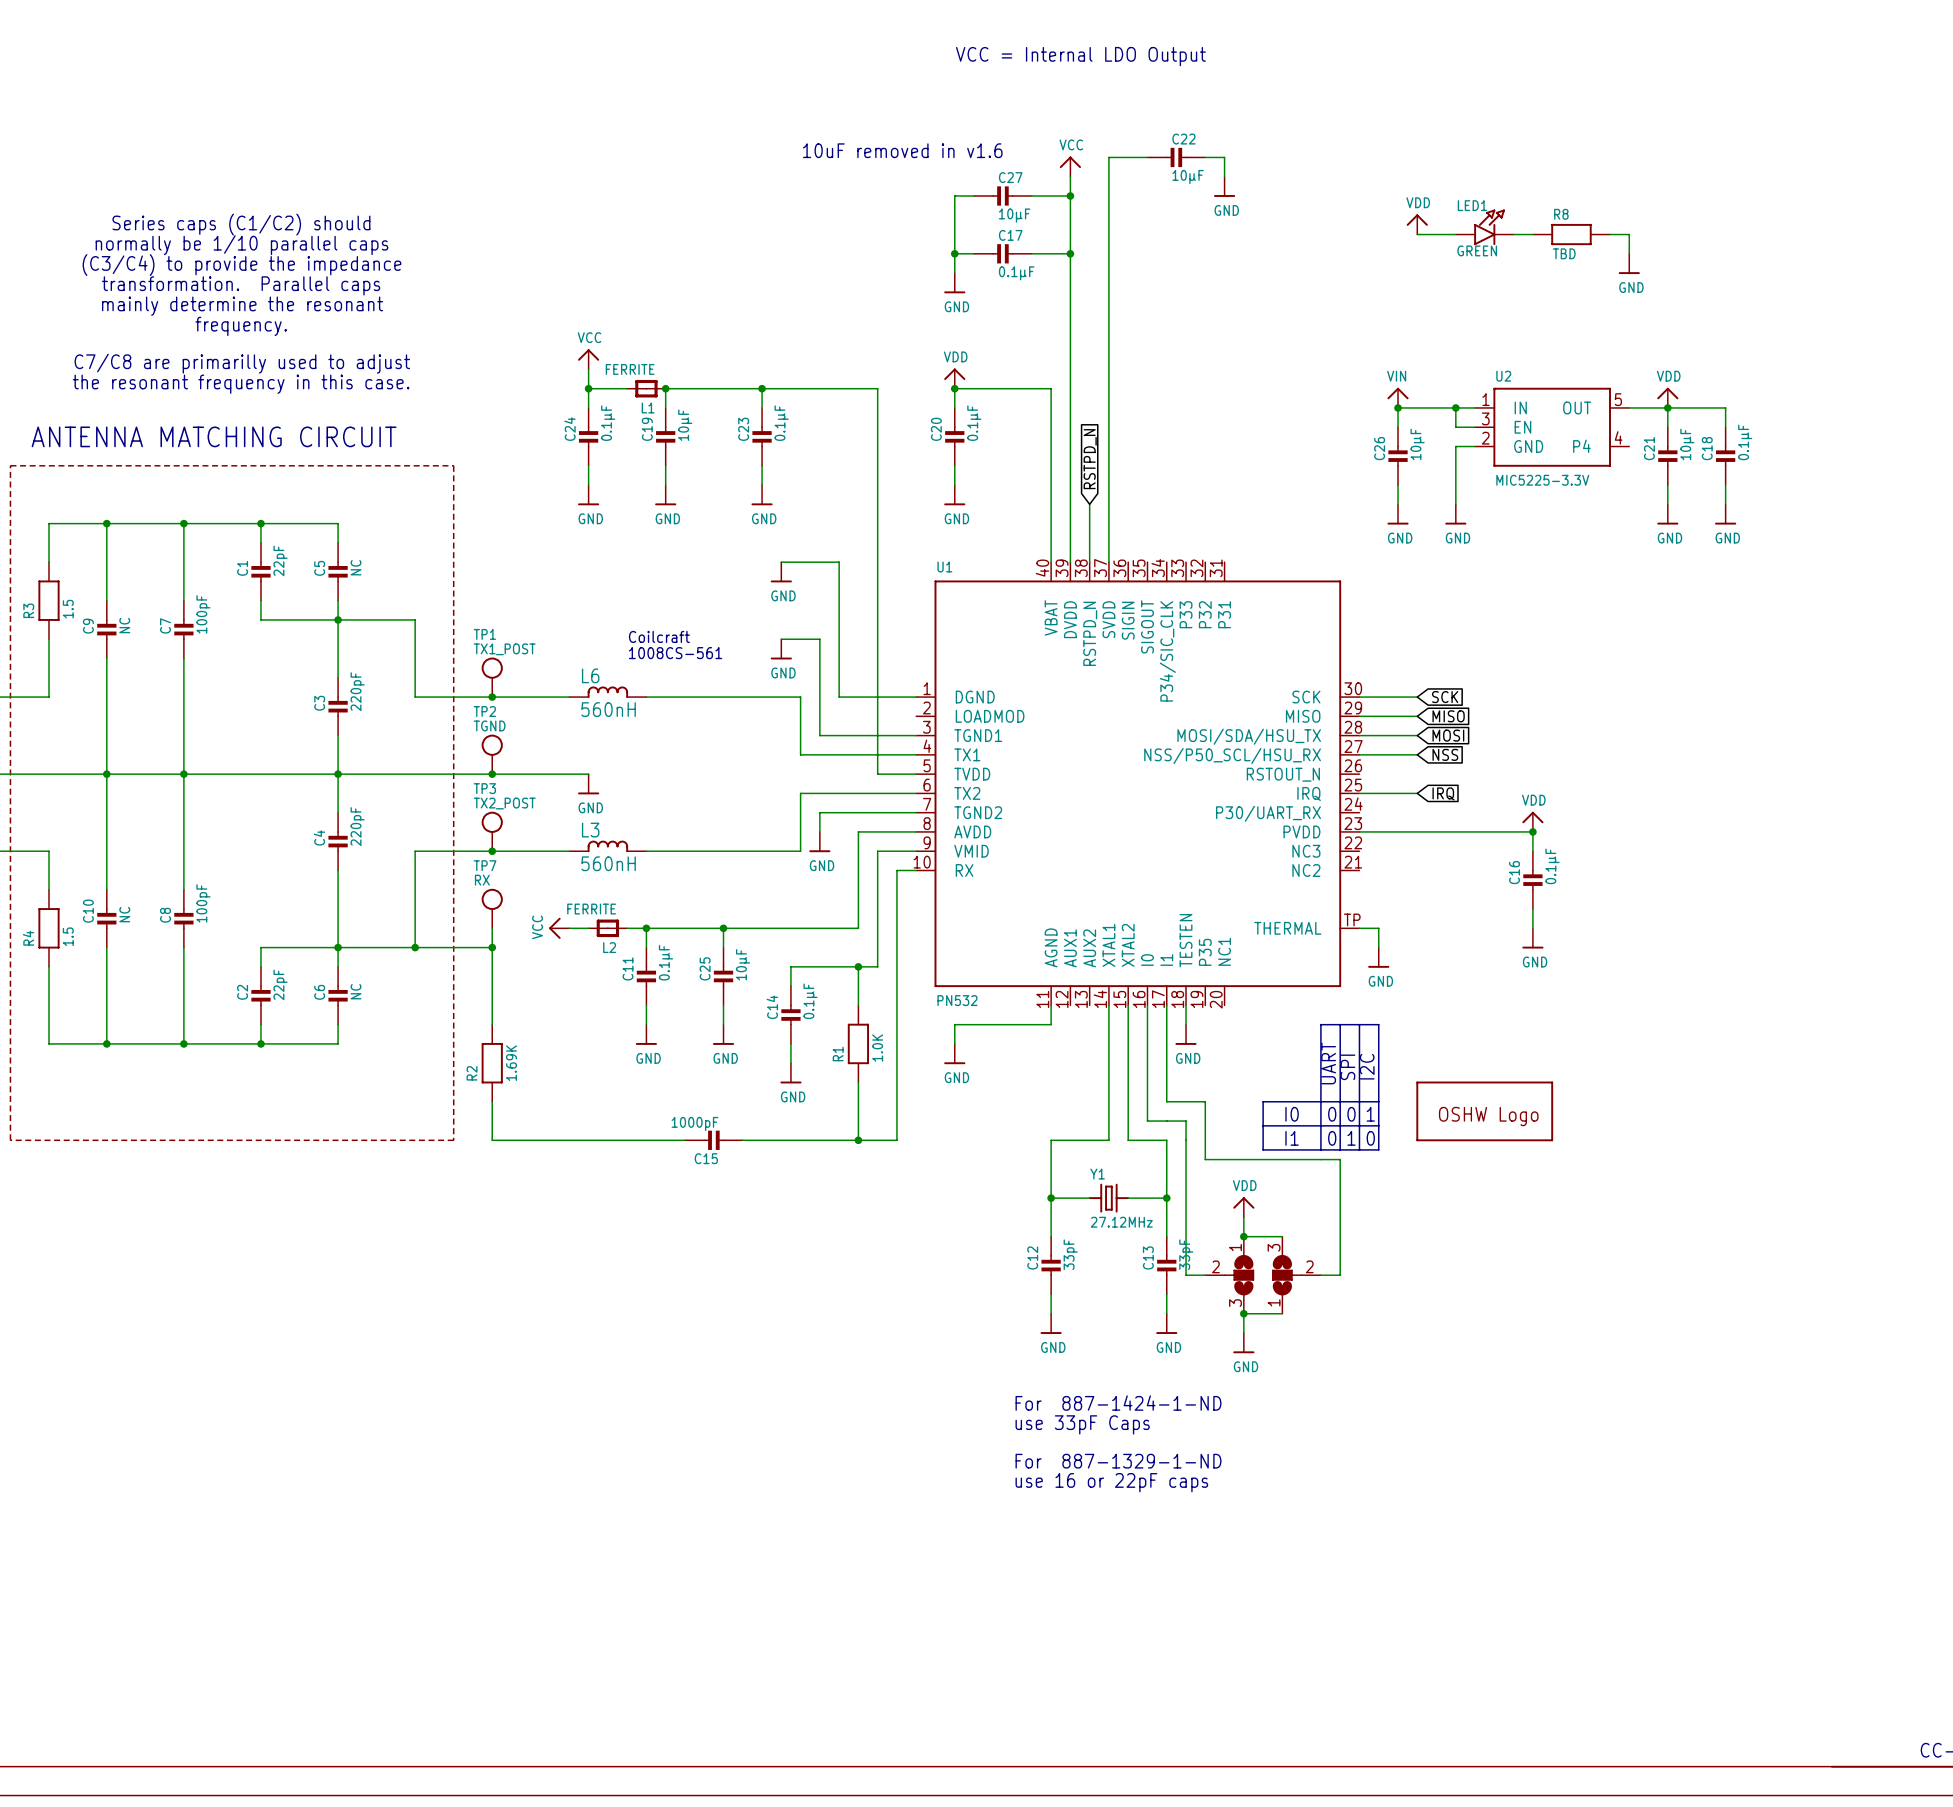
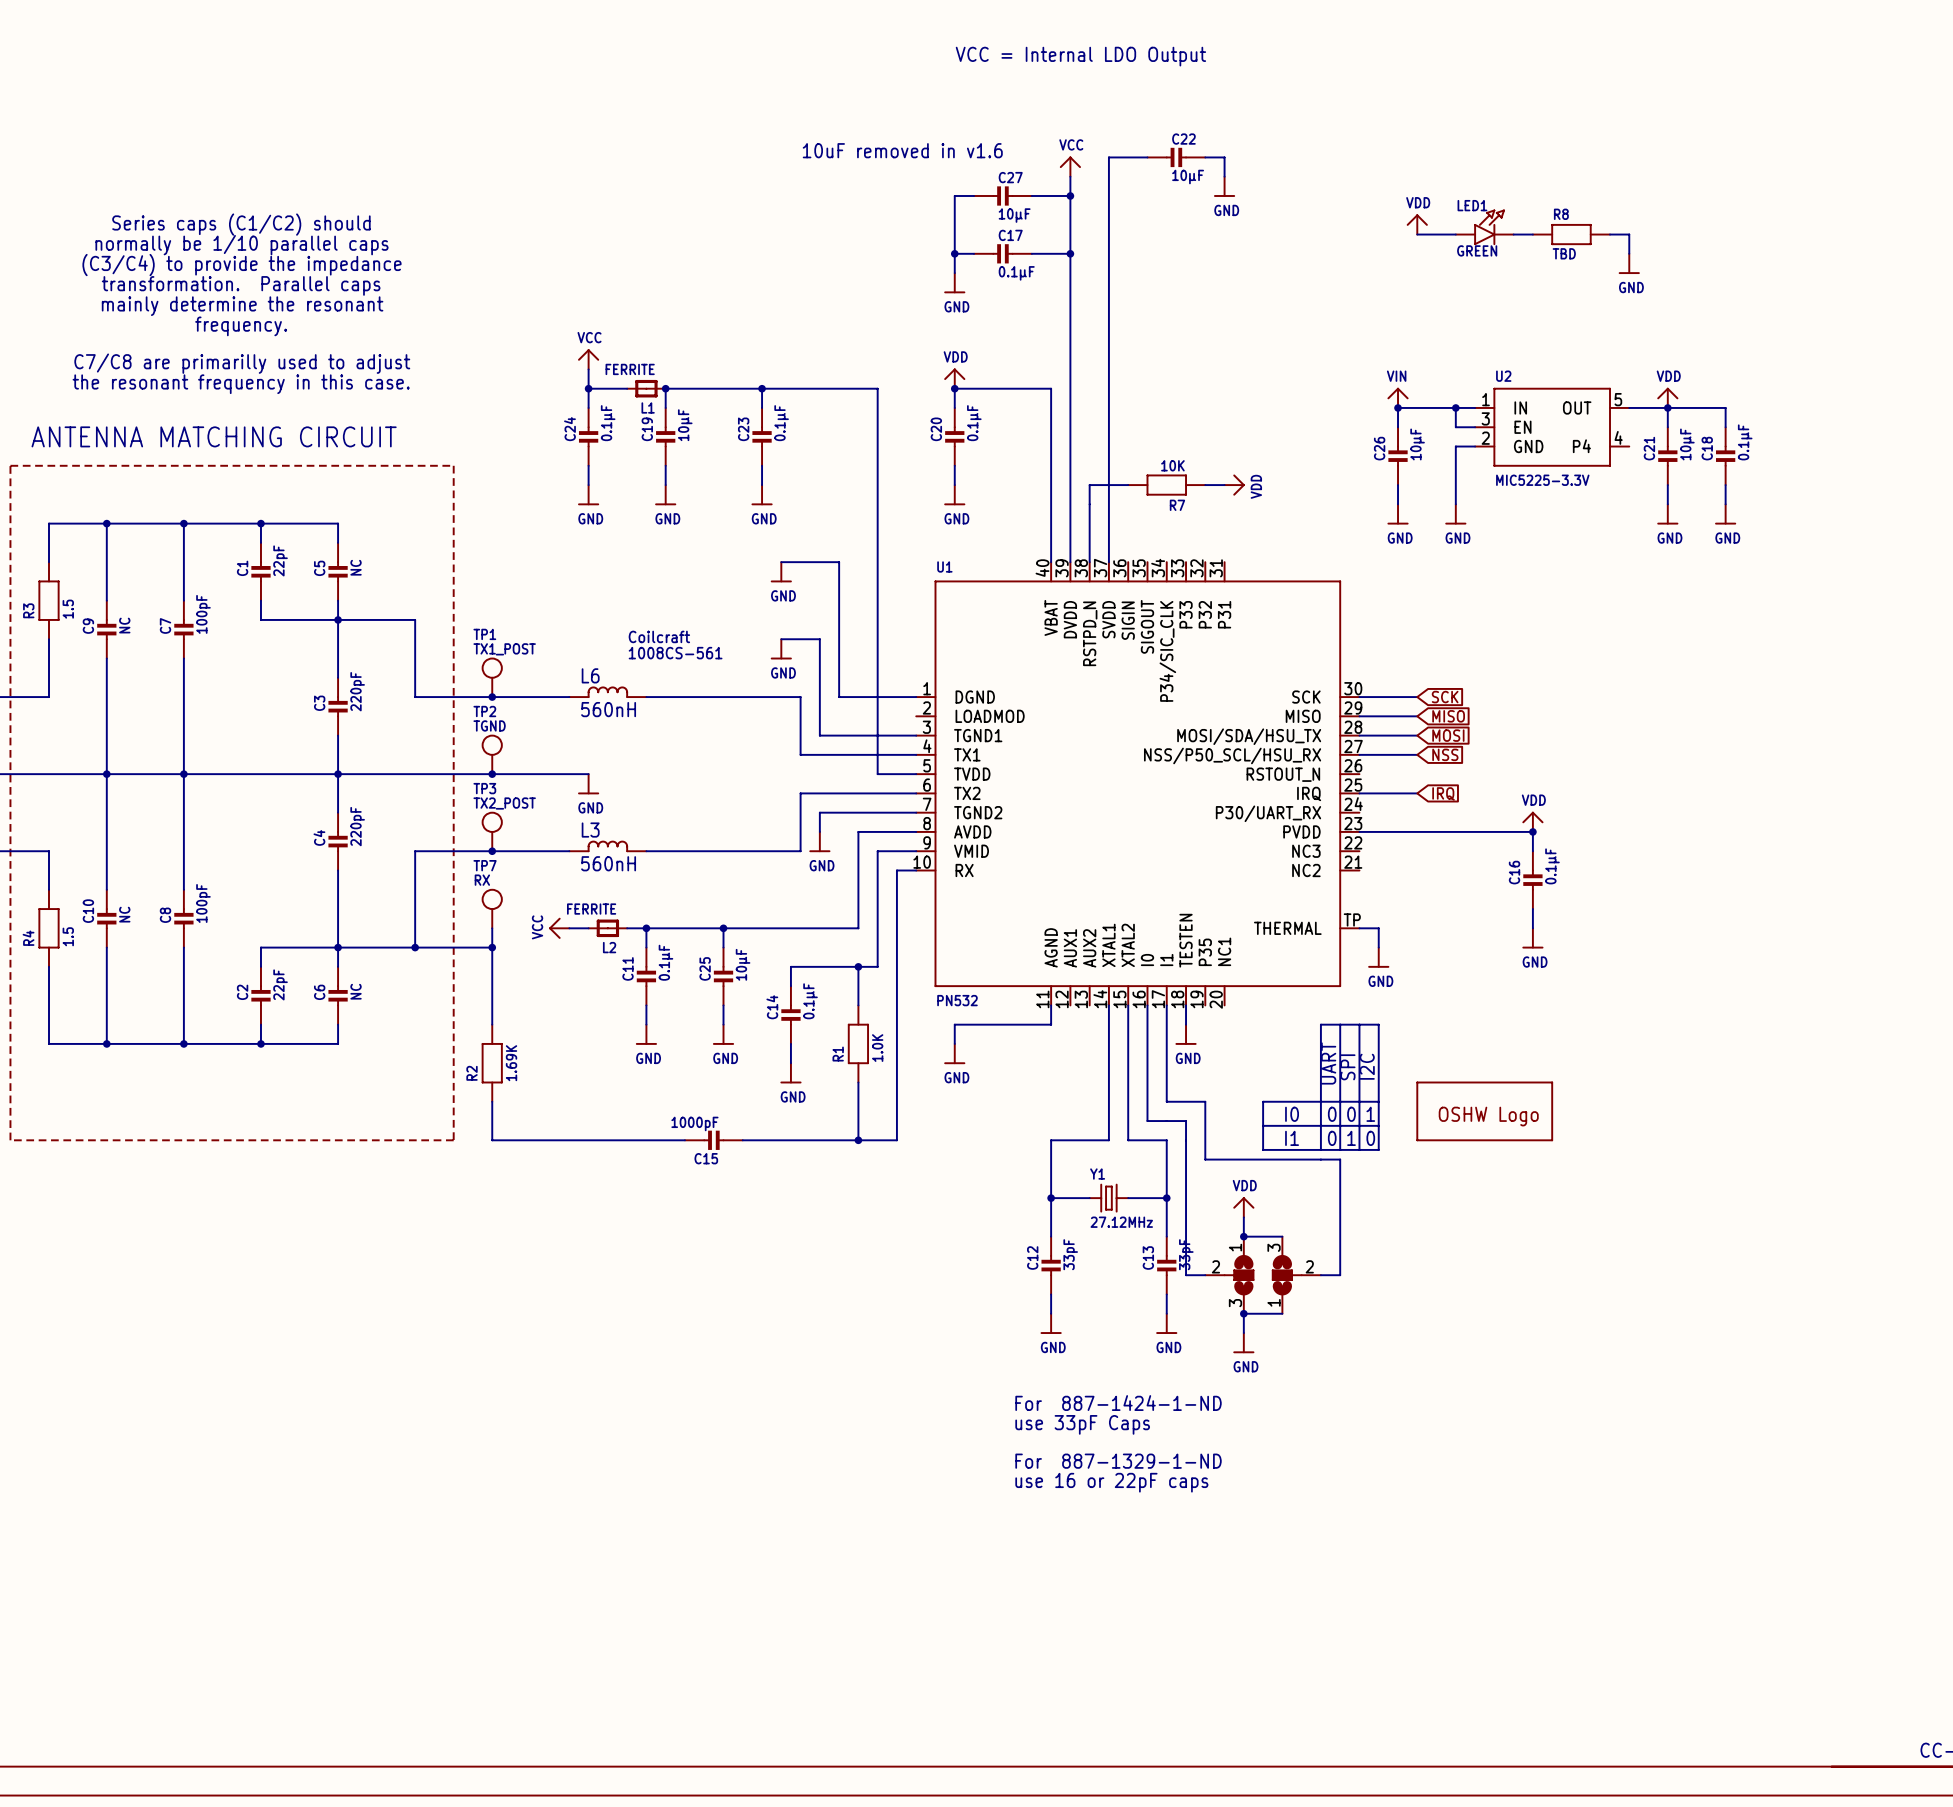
global label: RSTPD_N (1090, 459) -> none
wire: none -> (1128, 485) (1089, 485) (1089, 504)
R7: none -> 10K (1166, 485)
wire: none -> (1205, 485) (1224, 485)
power symbol: none -> VDD (1234, 485)

